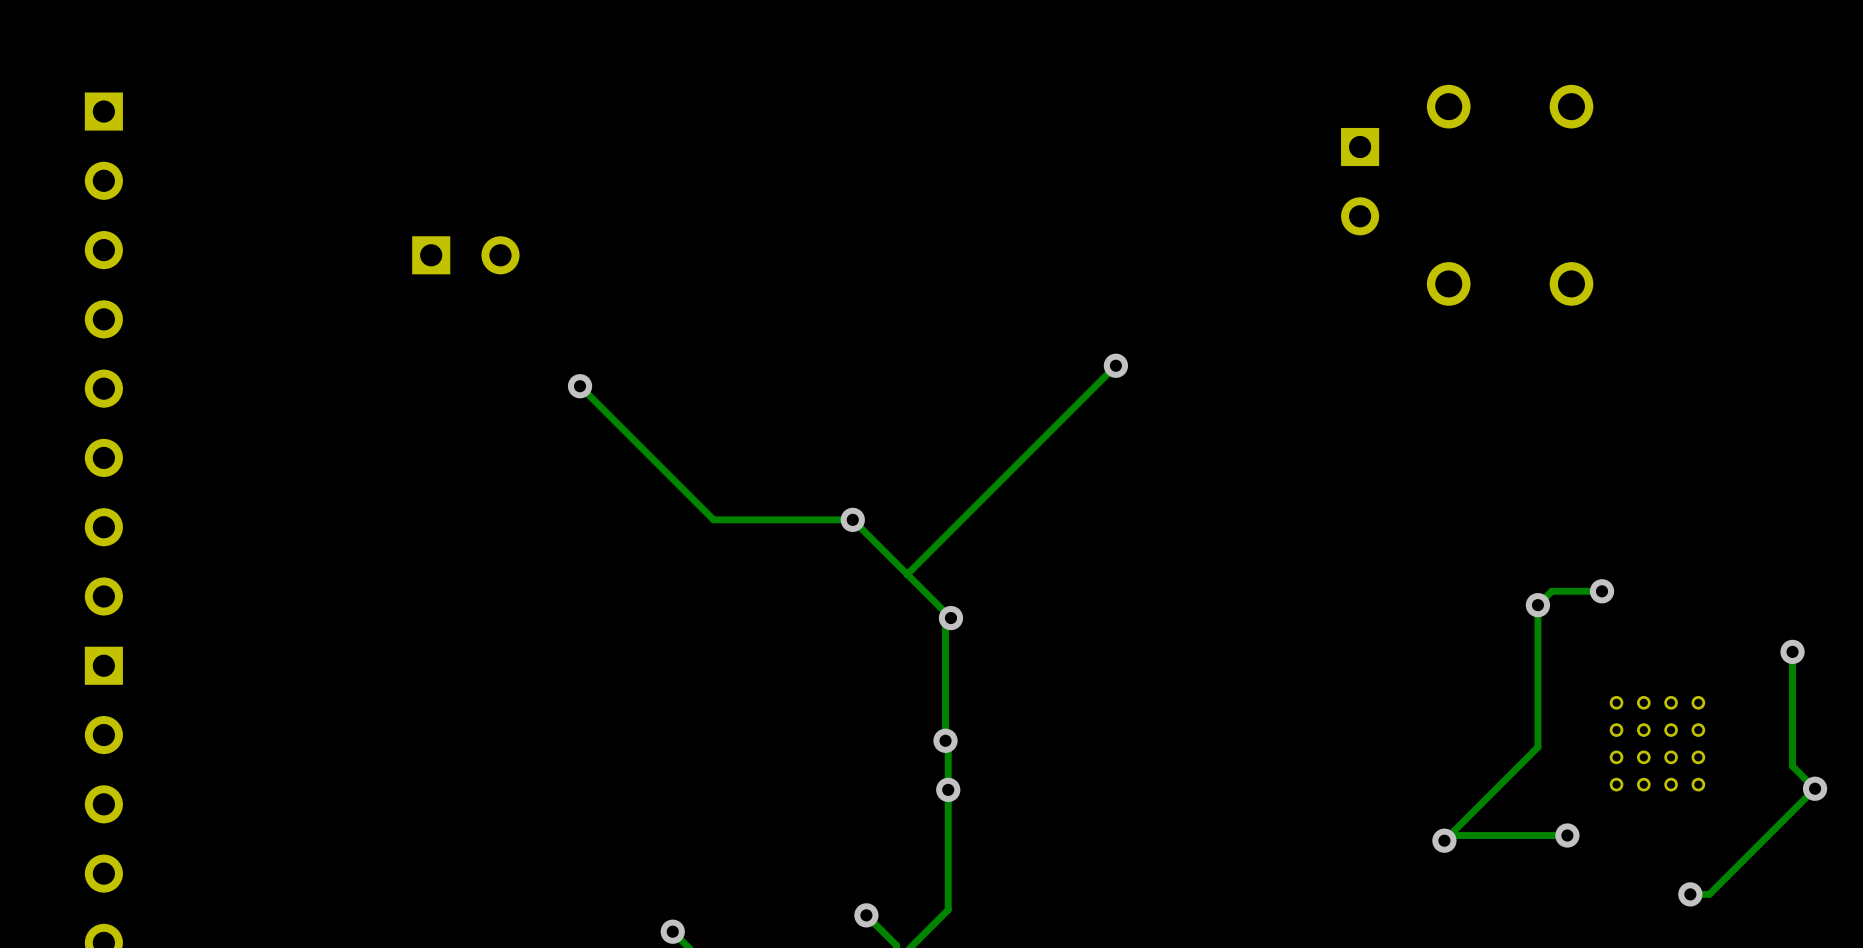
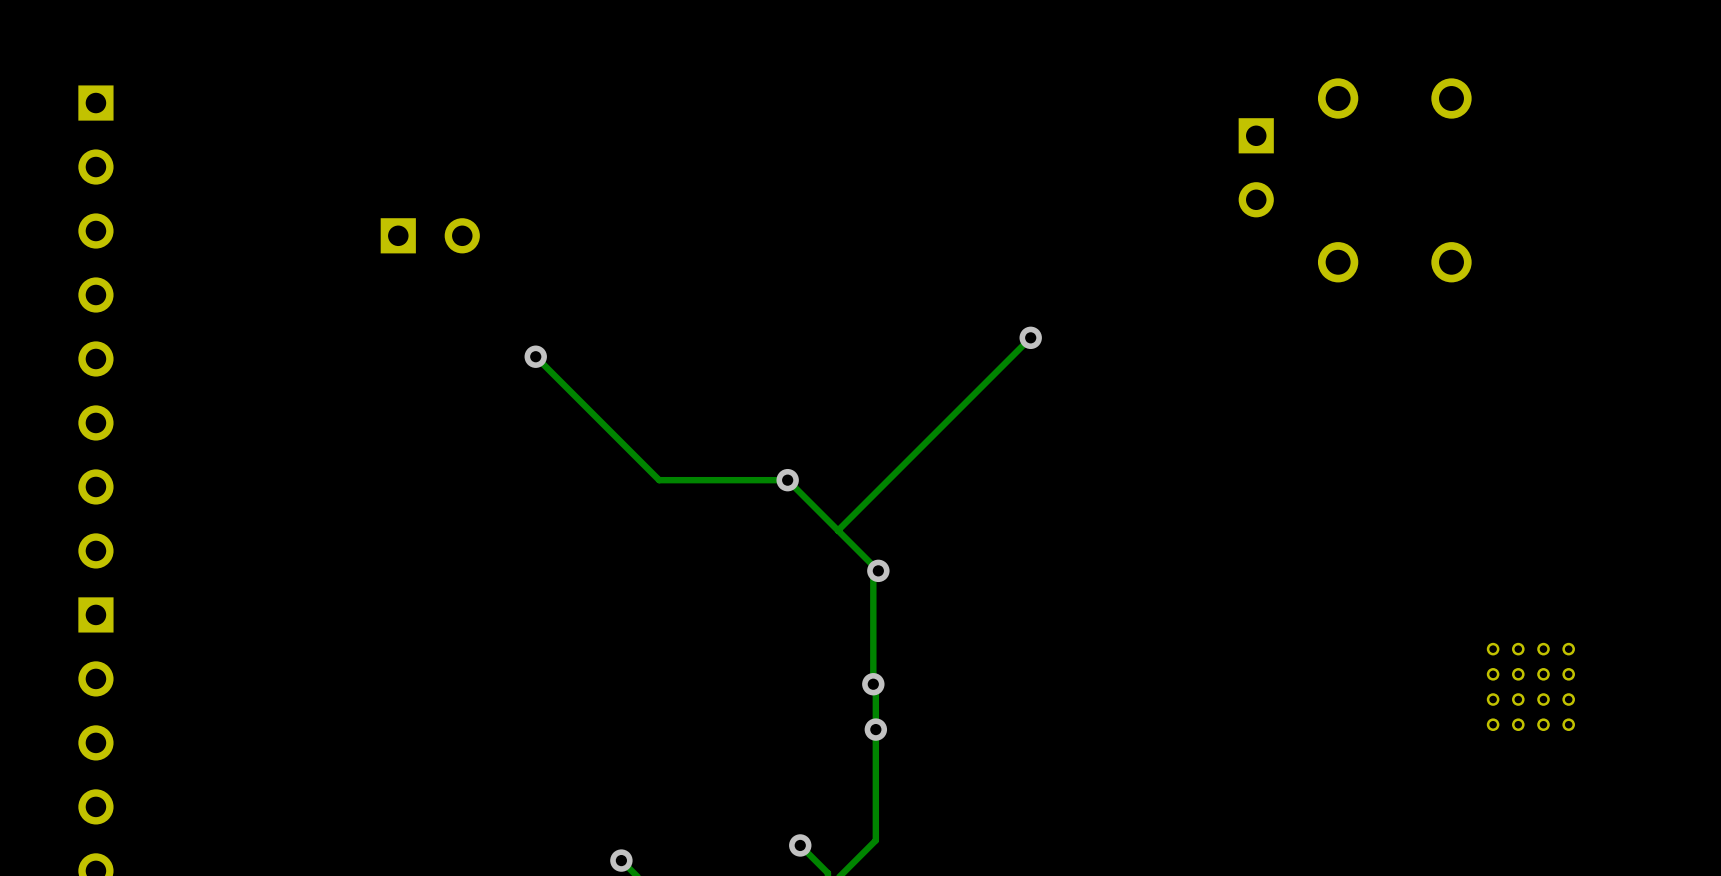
track: (1602, 591) (1551, 591) (1537, 605) (1537, 747) (1444, 840) -> none
via: (1602, 591) -> none
via: (1537, 605) -> none
track: (1792, 651) (1792, 766) (1815, 788) (1709, 894) (1690, 894) -> none
via: (1792, 651) -> none
via: (1815, 788) -> none
track: (1567, 835) (1449, 835) -> none
via: (1567, 835) -> none
via: (1444, 840) -> none
via: (1690, 894) -> none

